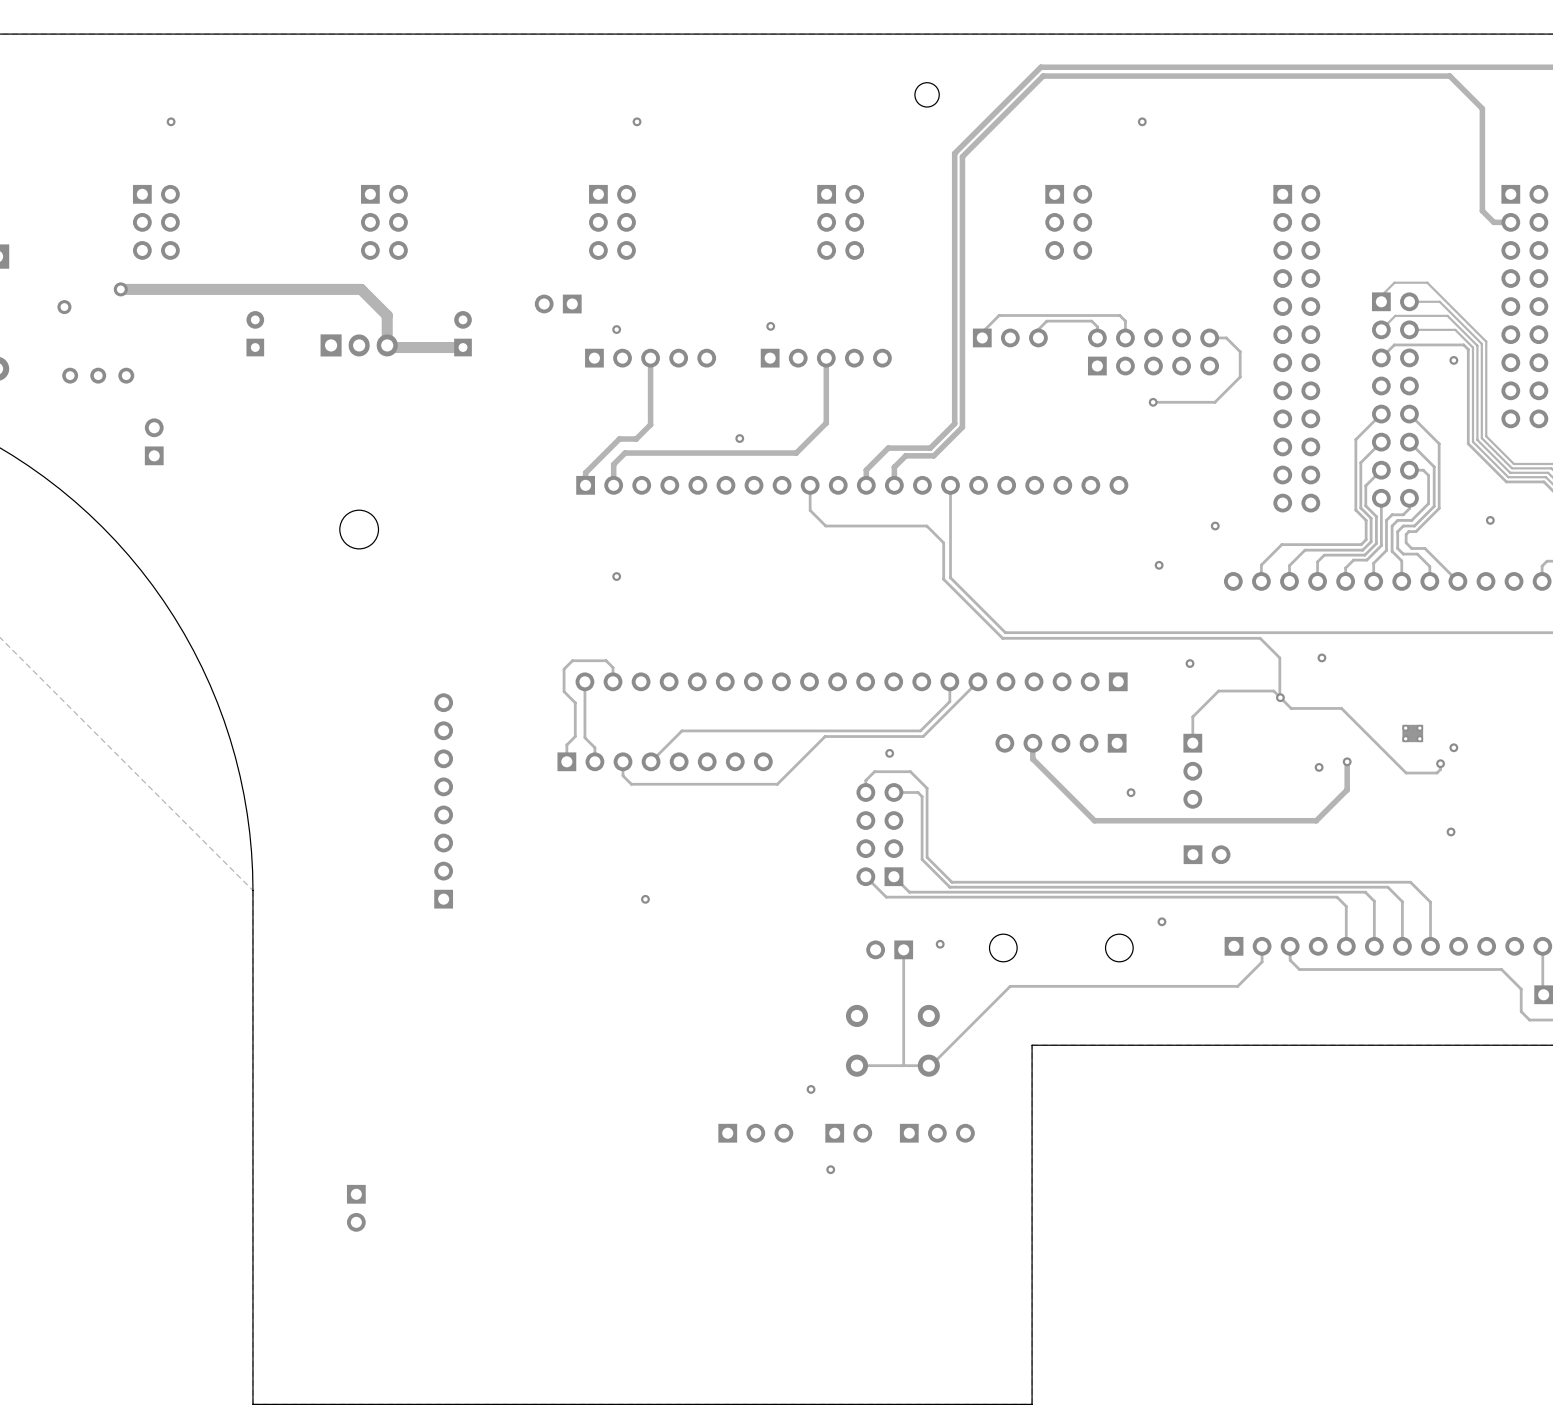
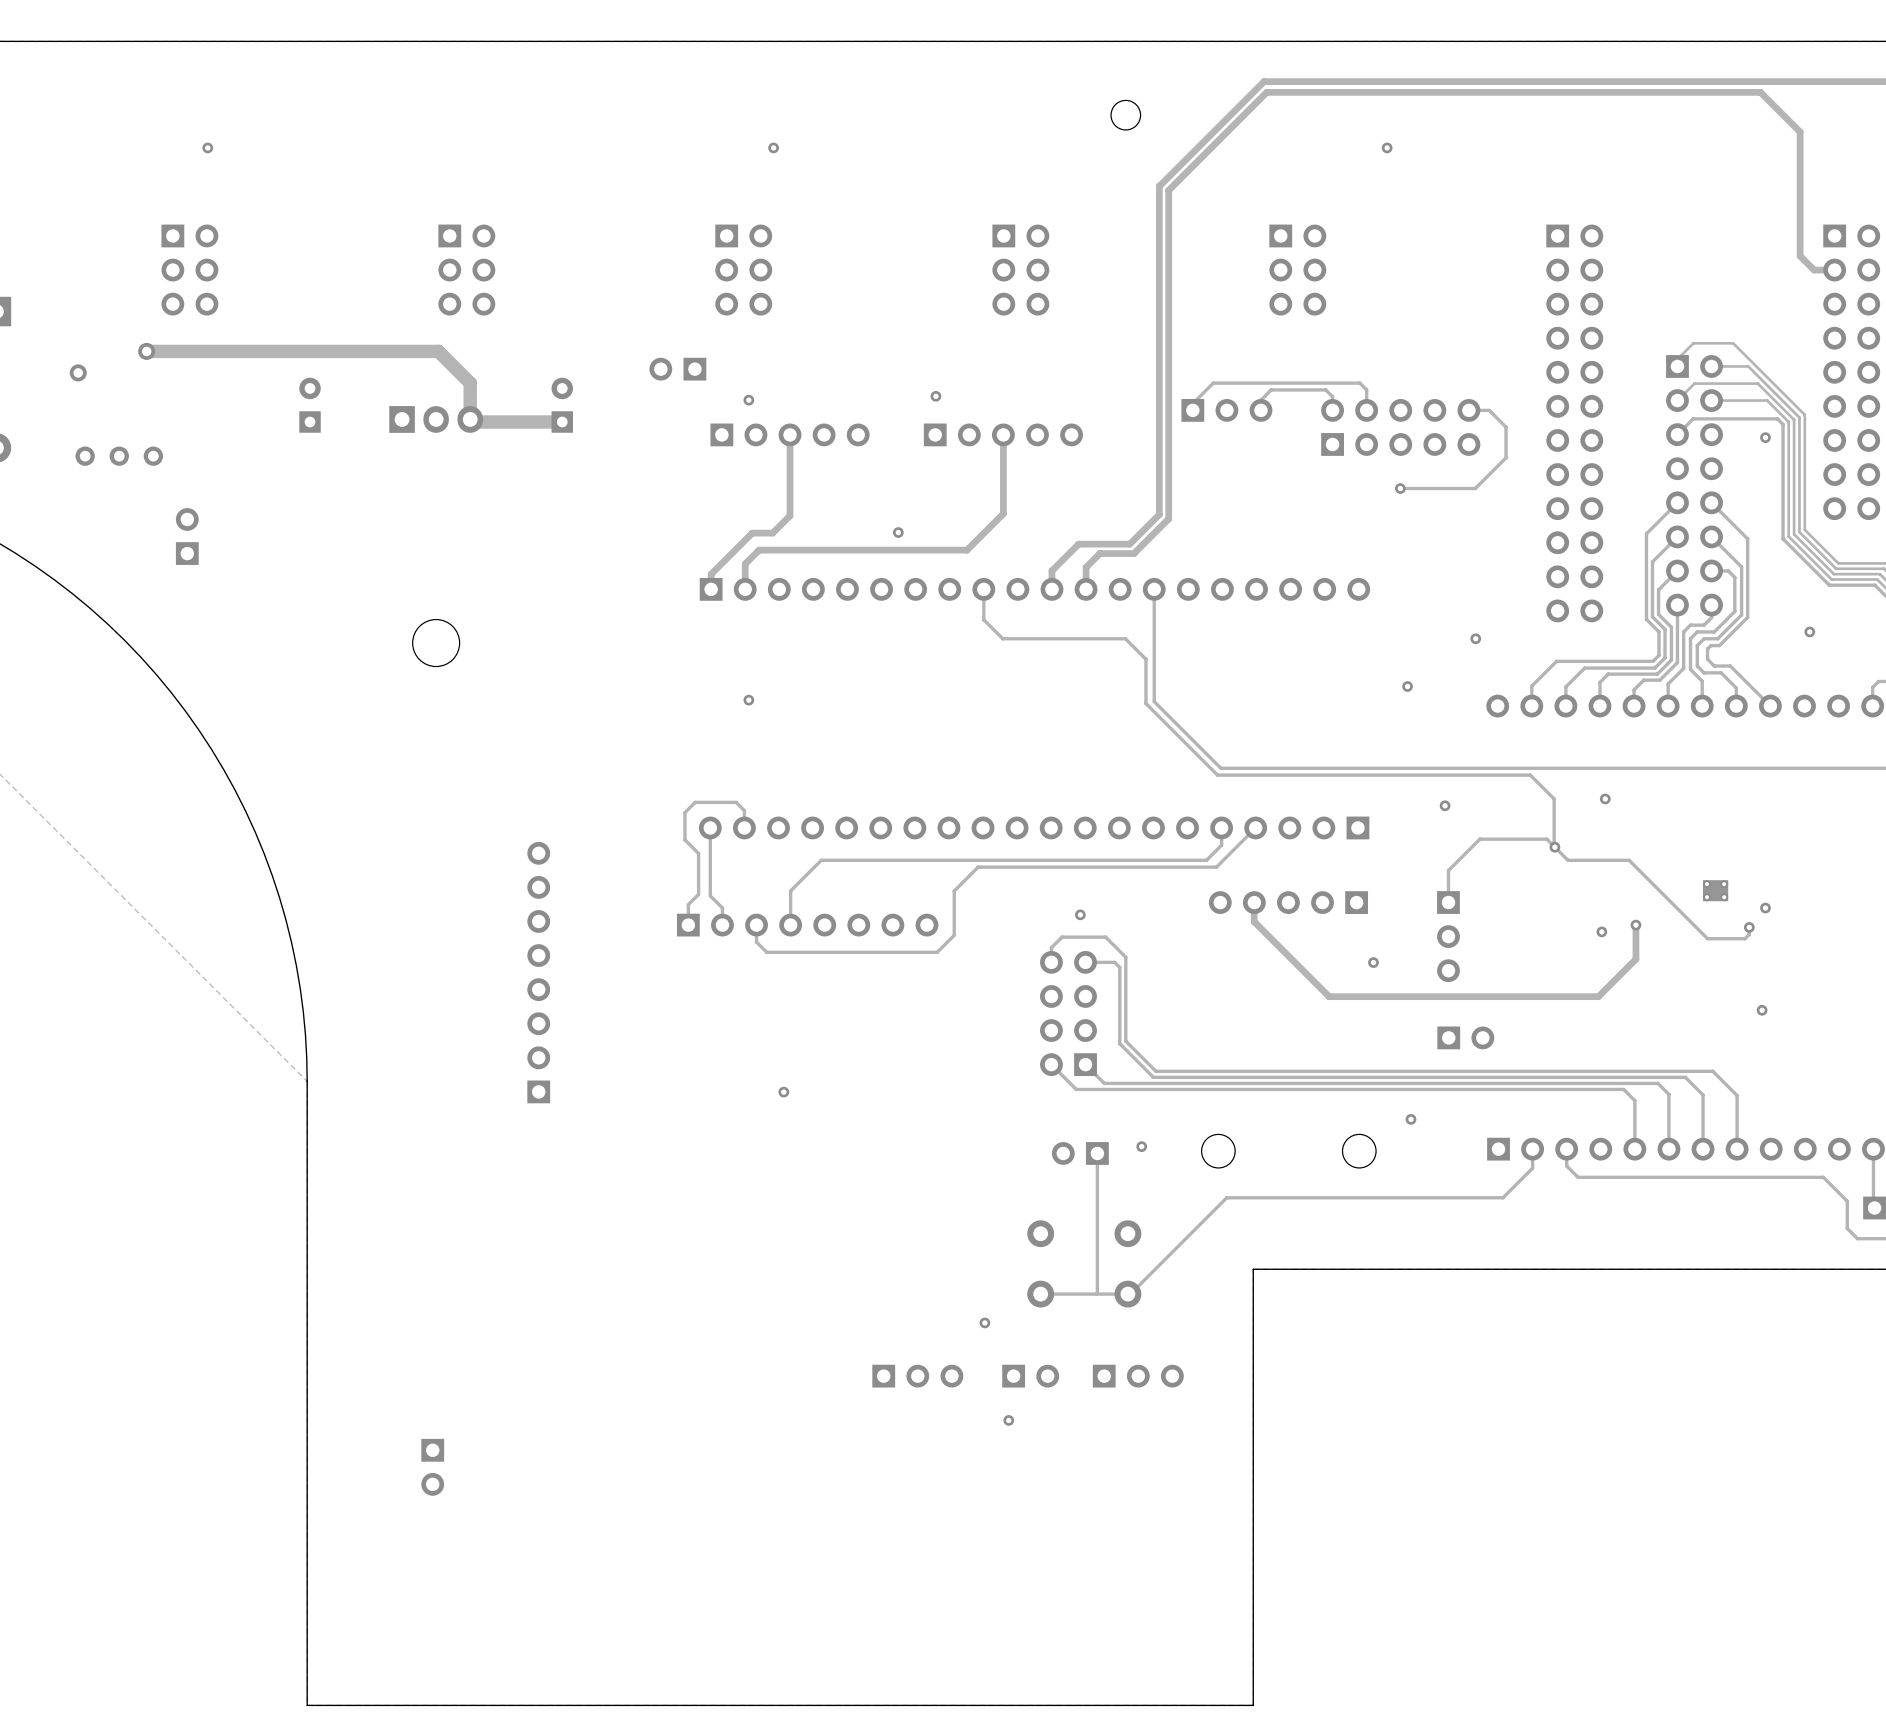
track: (949, 681) (949, 701) (920, 730) (681, 730) (651, 761) -> (1221, 827) (1221, 845) (1206, 860) (821, 860) (790, 891) (790, 925)
track: (977, 681) (923, 736) (825, 736) (777, 784) (771, 784) -> (1255, 827) (1216, 867) (978, 867) (954, 891) (954, 935) (937, 952)

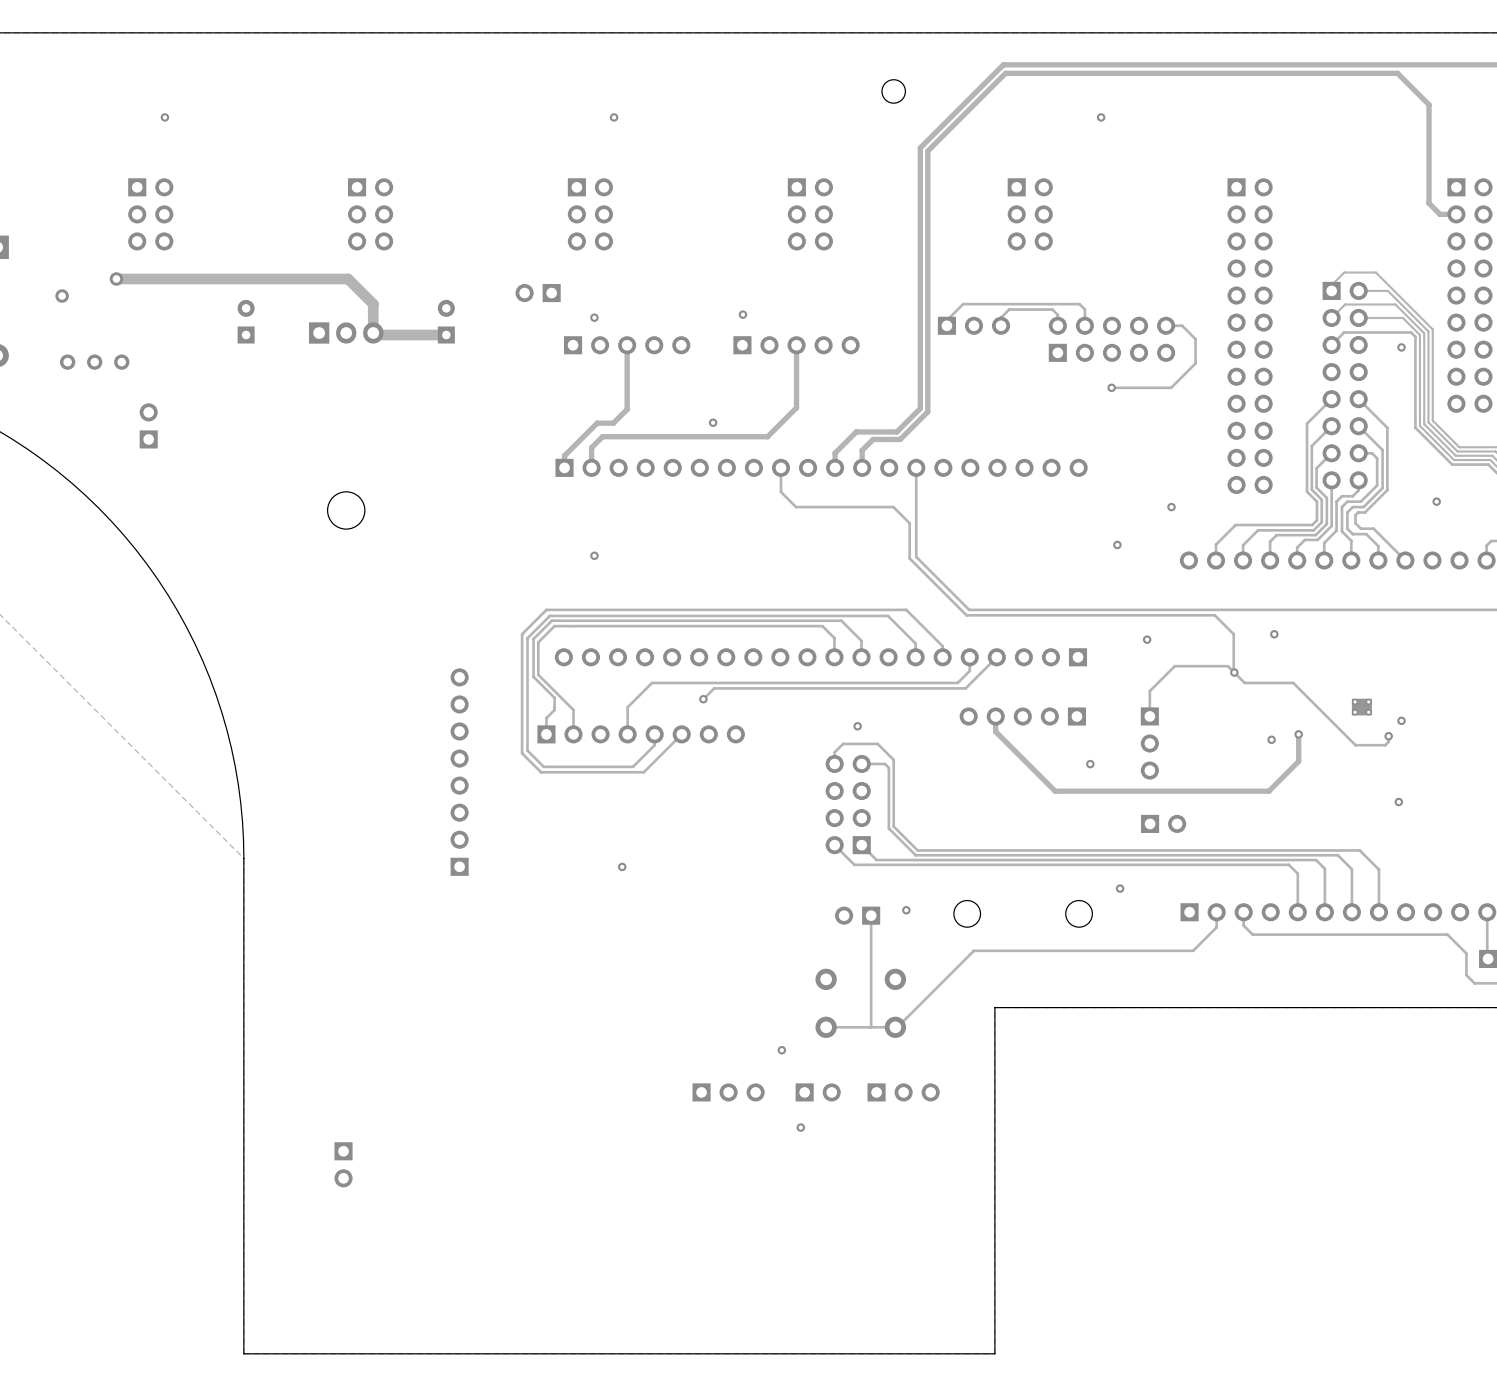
track: (710, 827) (710, 895) (722, 908) -> (834, 657) (834, 638) (822, 626) (554, 626) (538, 642) (538, 674) (573, 710) (573, 720)
track: (744, 827) (744, 810) (736, 802) (695, 802) (684, 812) (684, 839) (698, 853) (698, 879) -> (861, 657) (861, 640) (841, 620) (551, 620) (533, 639) (533, 676) (554, 697)
track: none -> (915, 657) (915, 643) (888, 615) (549, 615) (527, 638) (527, 750) (543, 766) (633, 766) (654, 745) (654, 734)
track: none -> (942, 657) (942, 646) (906, 609) (546, 609) (522, 634) (522, 753) (541, 772) (643, 772) (681, 734)
track: (978, 867) (954, 891) (954, 935) (937, 952) (766, 952) (756, 942) (756, 925) -> (776, 688) (714, 688) (703, 699)
via: none -> (703, 699)
part position: (538, 972) -> (459, 772)

